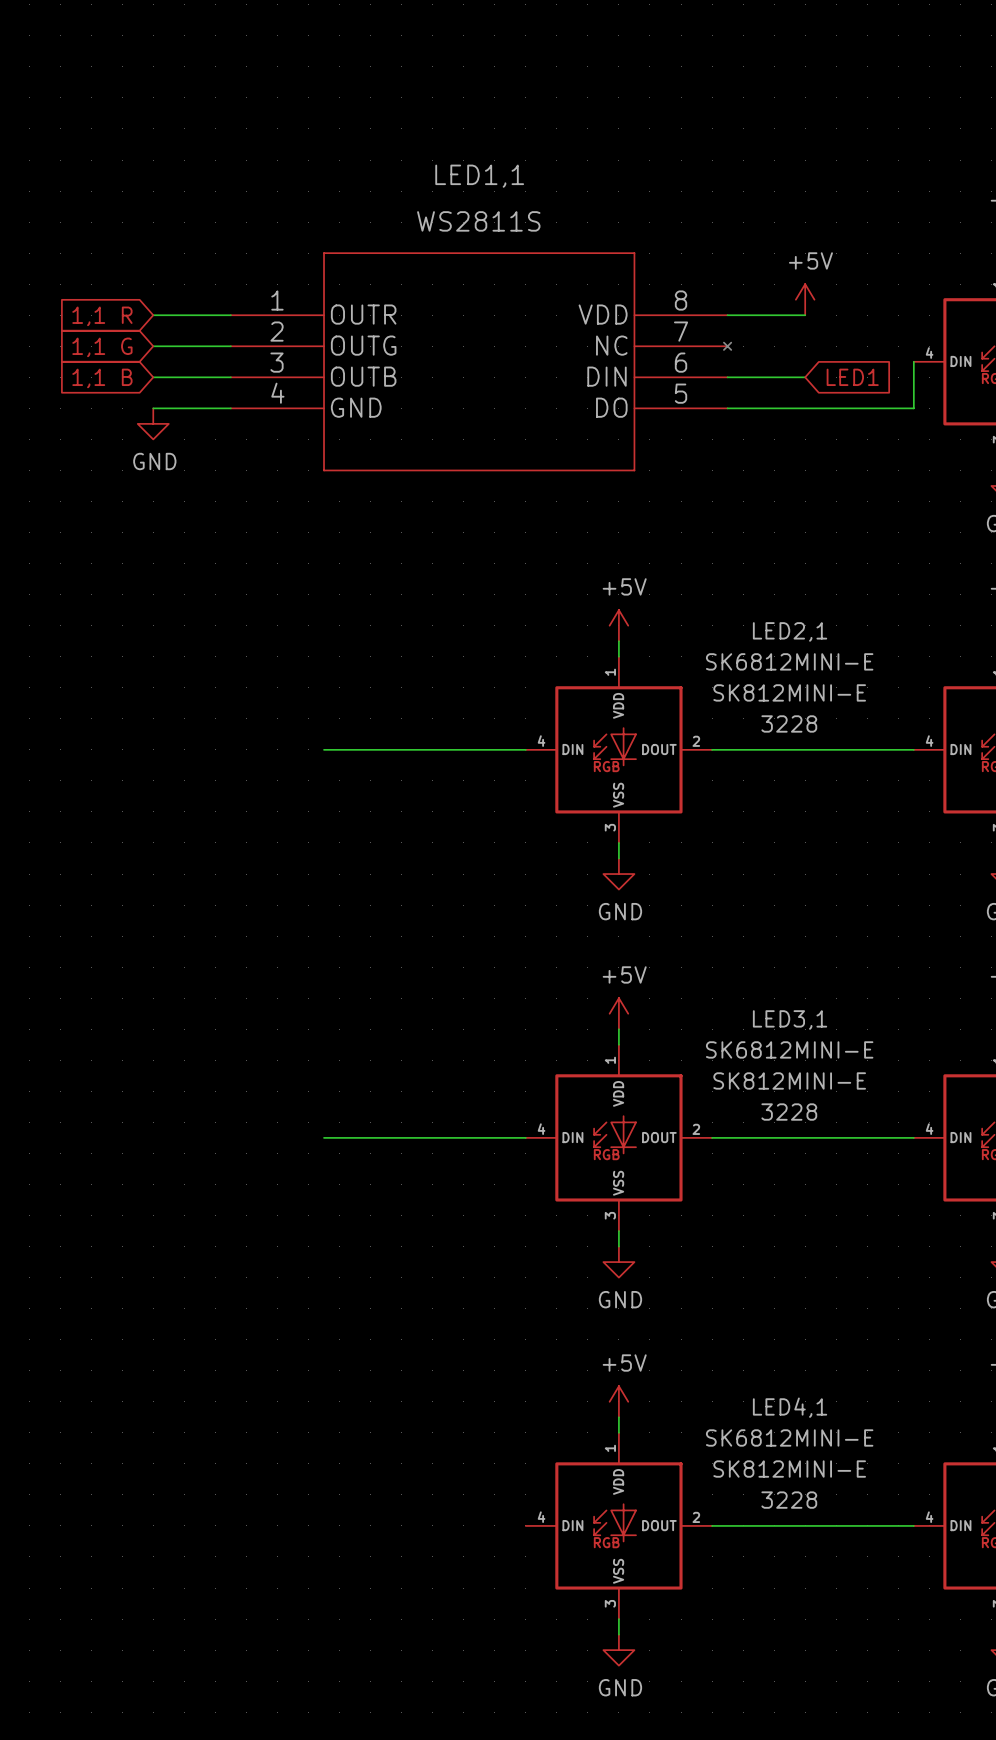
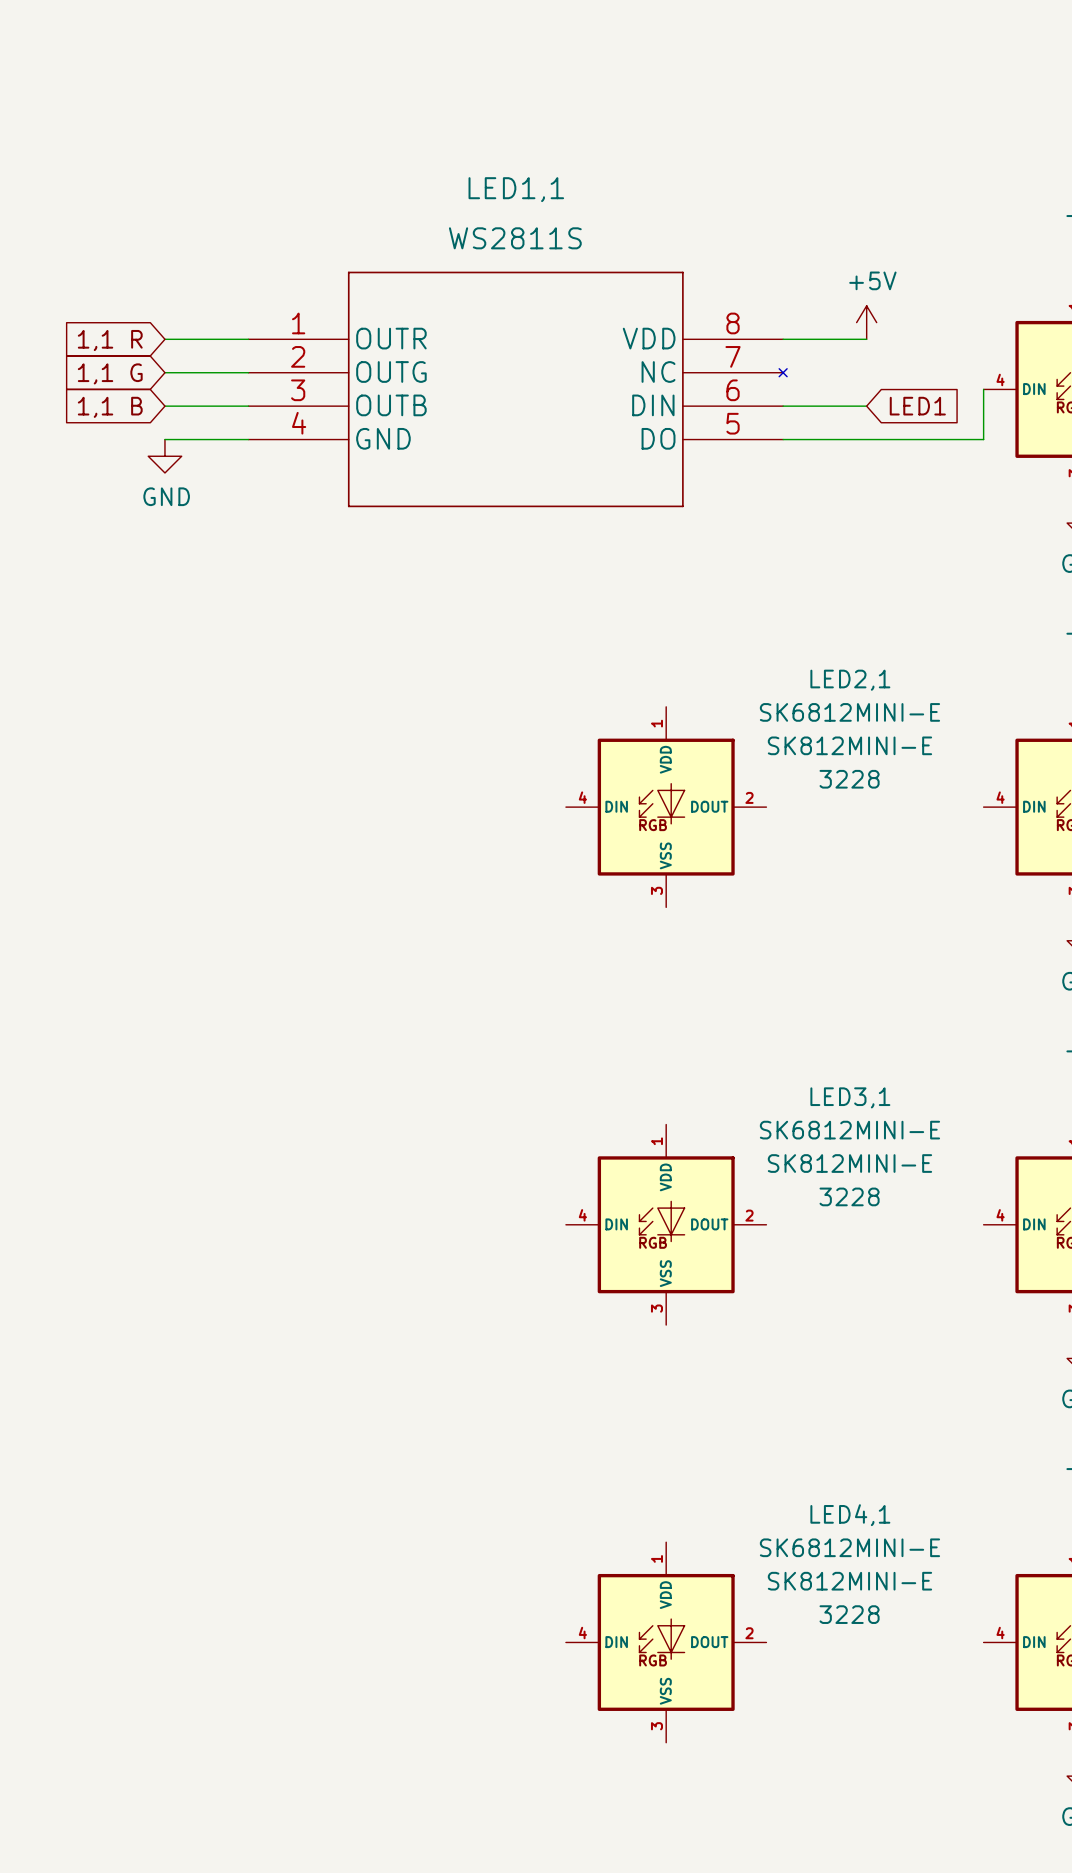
power symbol: +5V (618, 625) -> none
wire: (618, 641) (618, 656) -> none
wire: (324, 749) (525, 749) -> none
wire: (712, 749) (913, 749) -> none
wire: (618, 842) (618, 858) -> none
power symbol: GND (618, 874) -> none
power symbol: +5V (618, 1013) -> none
wire: (618, 1029) (618, 1044) -> none
wire: (324, 1137) (525, 1137) -> none
wire: (712, 1137) (913, 1137) -> none
wire: (618, 1231) (618, 1246) -> none
power symbol: GND (618, 1262) -> none
power symbol: +5V (618, 1401) -> none
wire: (618, 1417) (618, 1432) -> none
wire: (712, 1525) (913, 1525) -> none
wire: (618, 1619) (618, 1634) -> none
power symbol: GND (618, 1650) -> none

